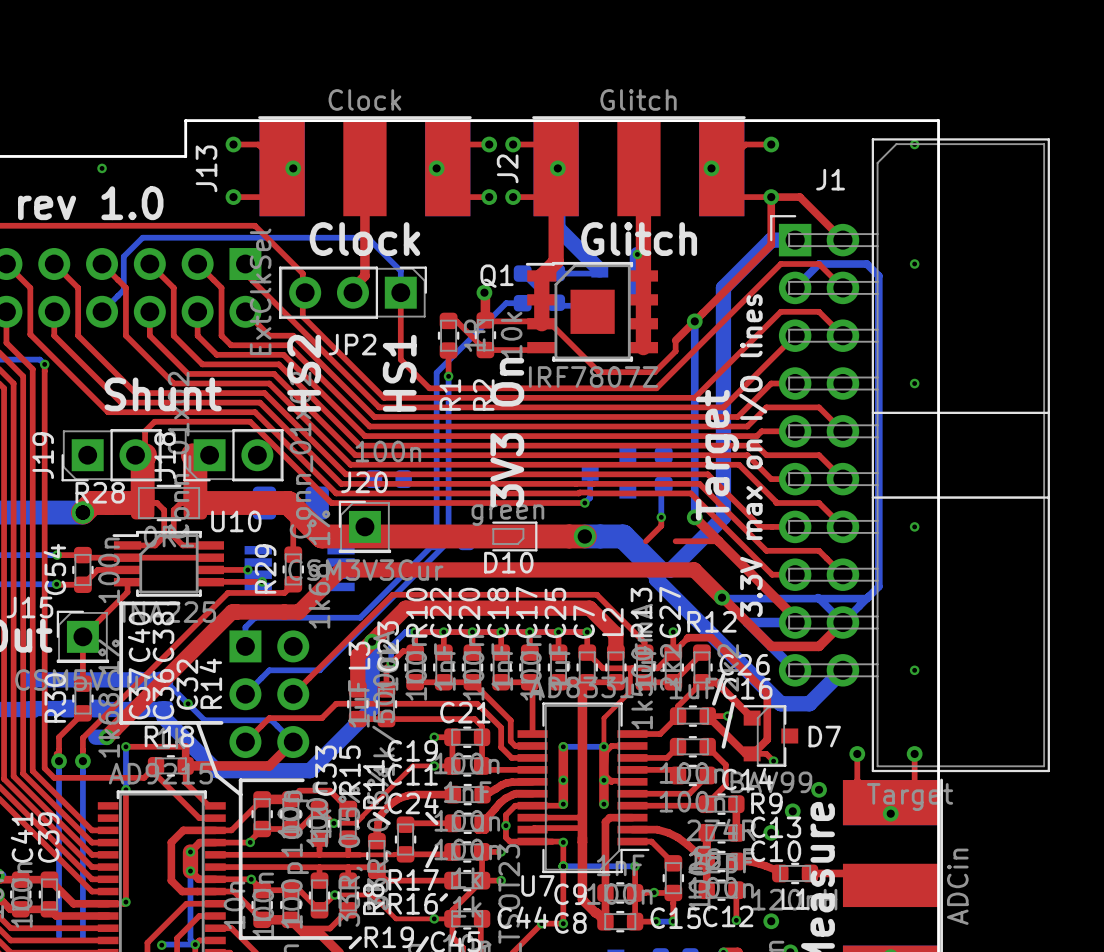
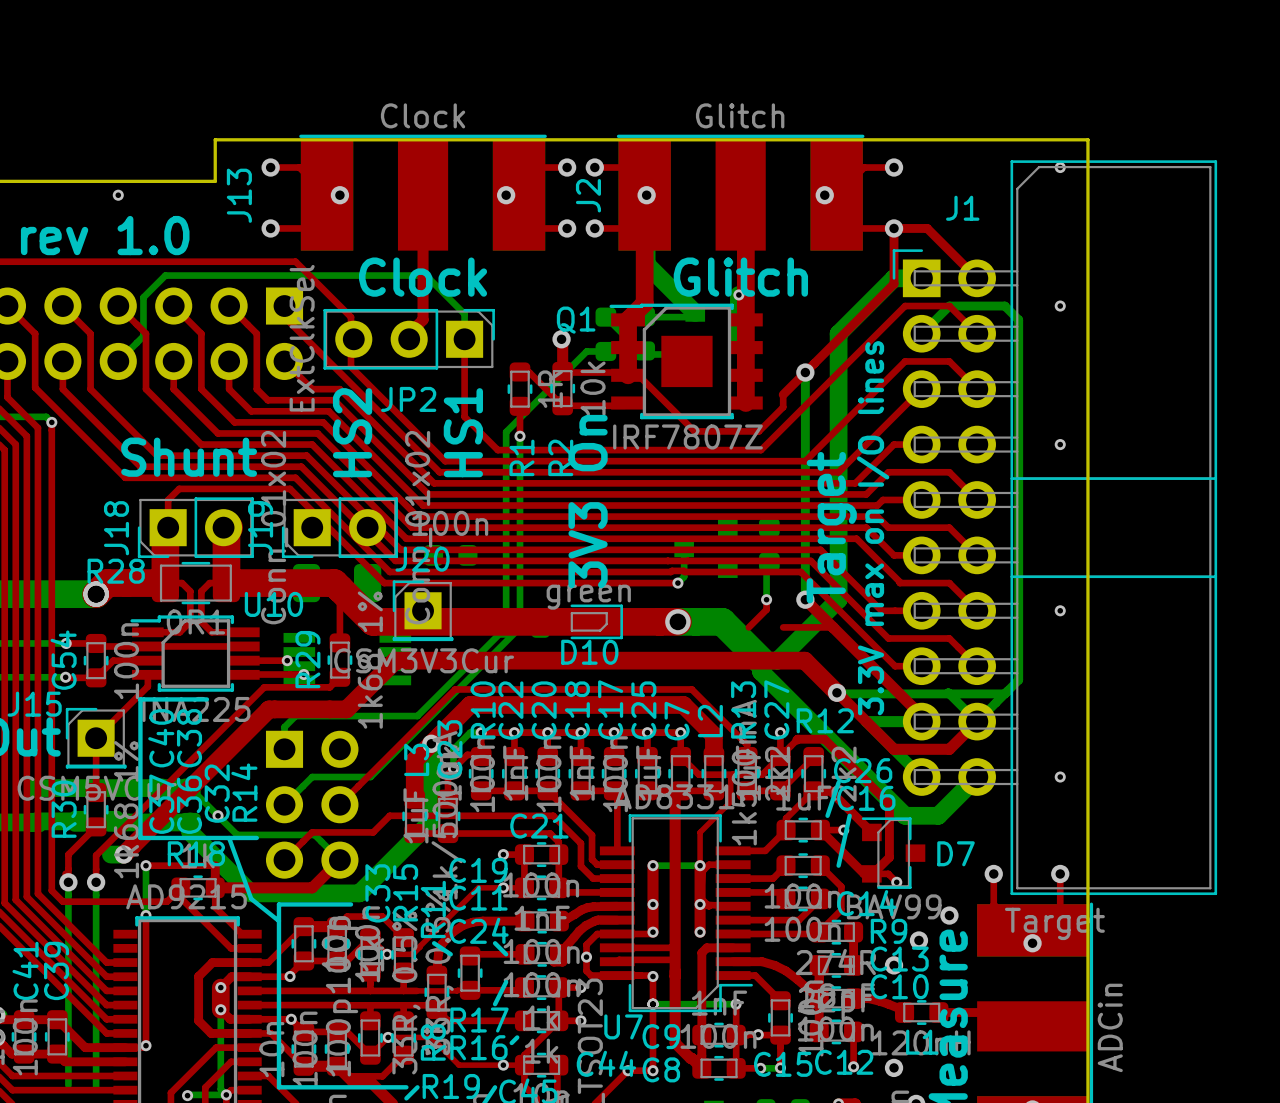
J19 position: (111, 455) -> (339, 527)
J18 position: (233, 455) -> (195, 527)

